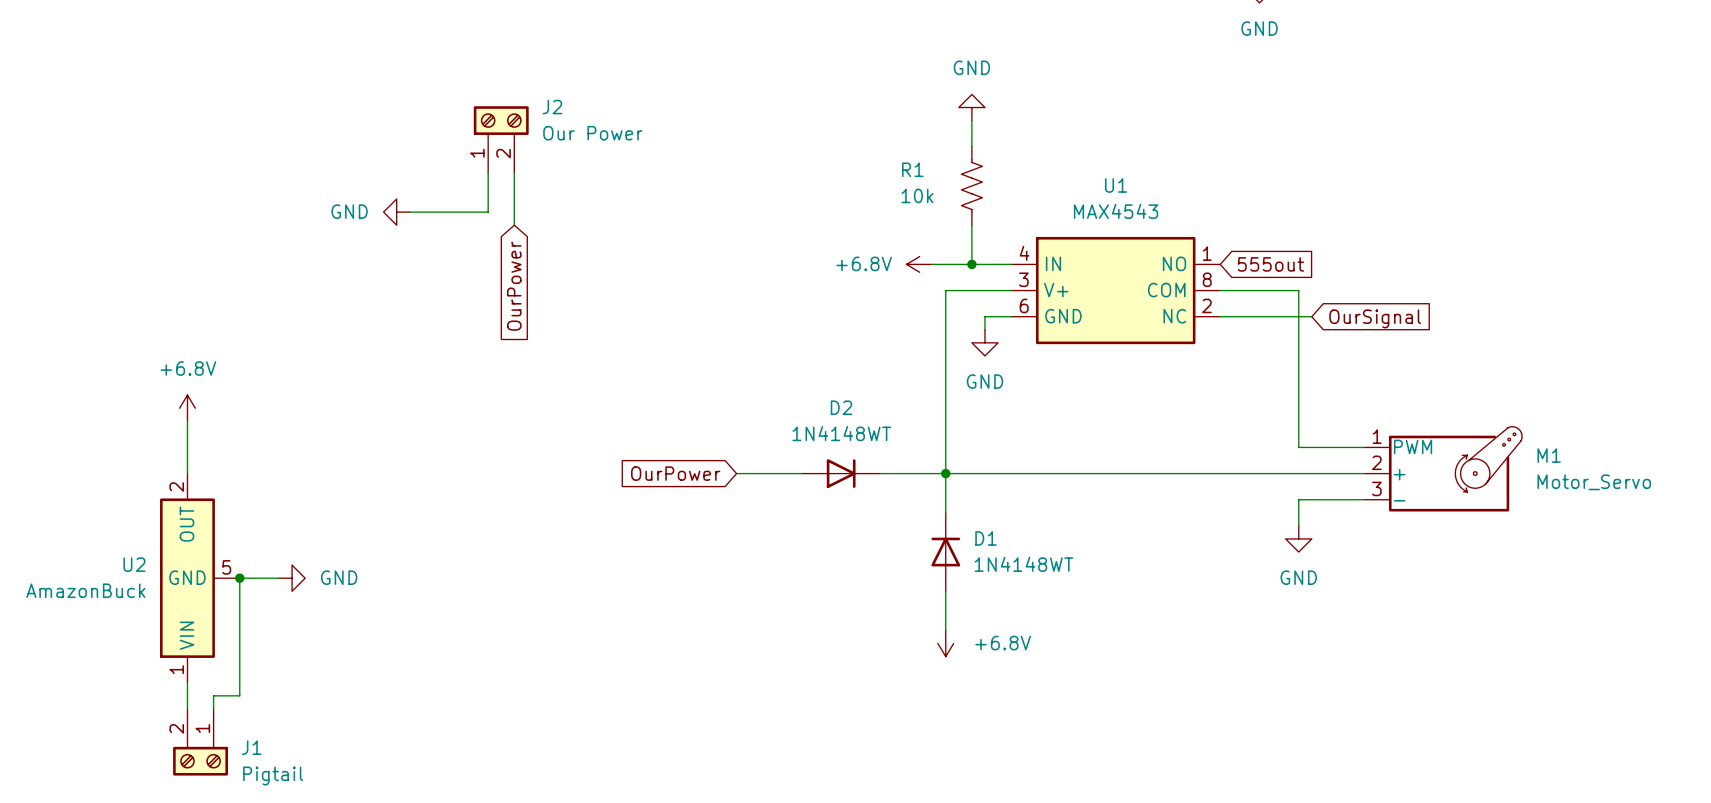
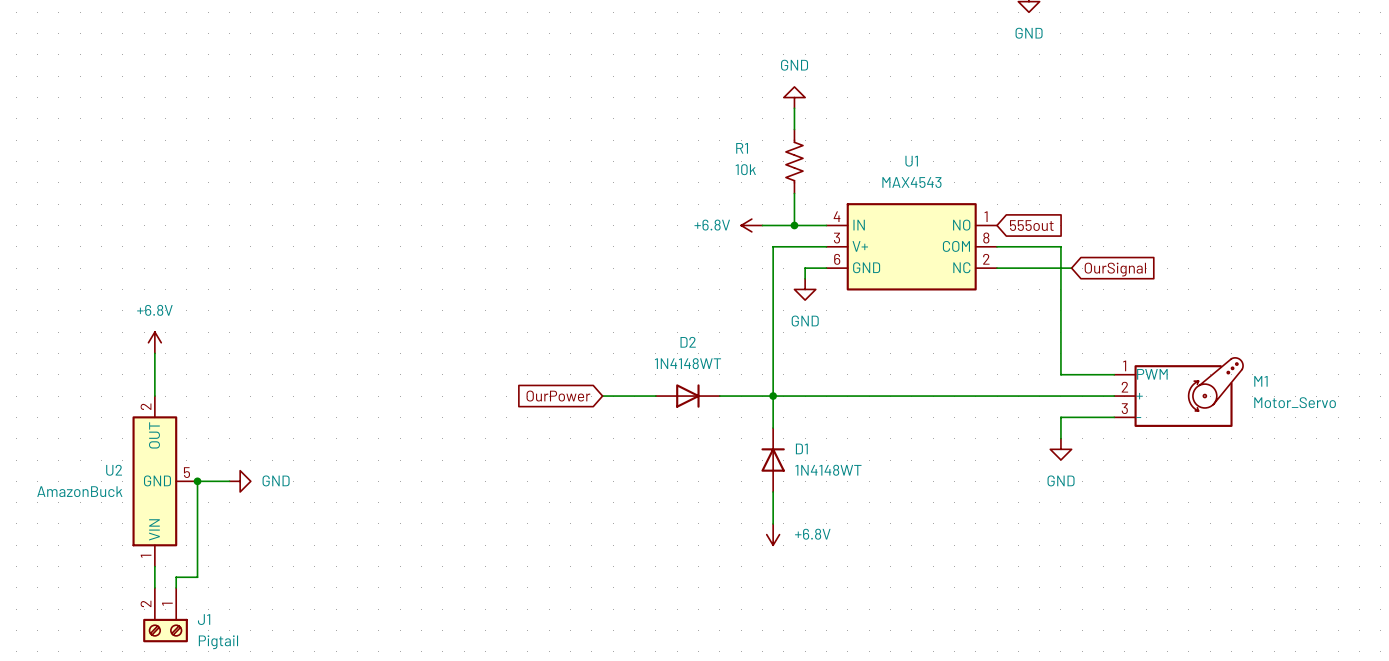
J2: Our Power (501, 139) -> none
wire: (488, 172) (488, 212) (409, 212) -> none
wire: (514, 172) (514, 225) -> none
power symbol: GND (396, 212) -> none
global label: OurPower (514, 286) -> none

